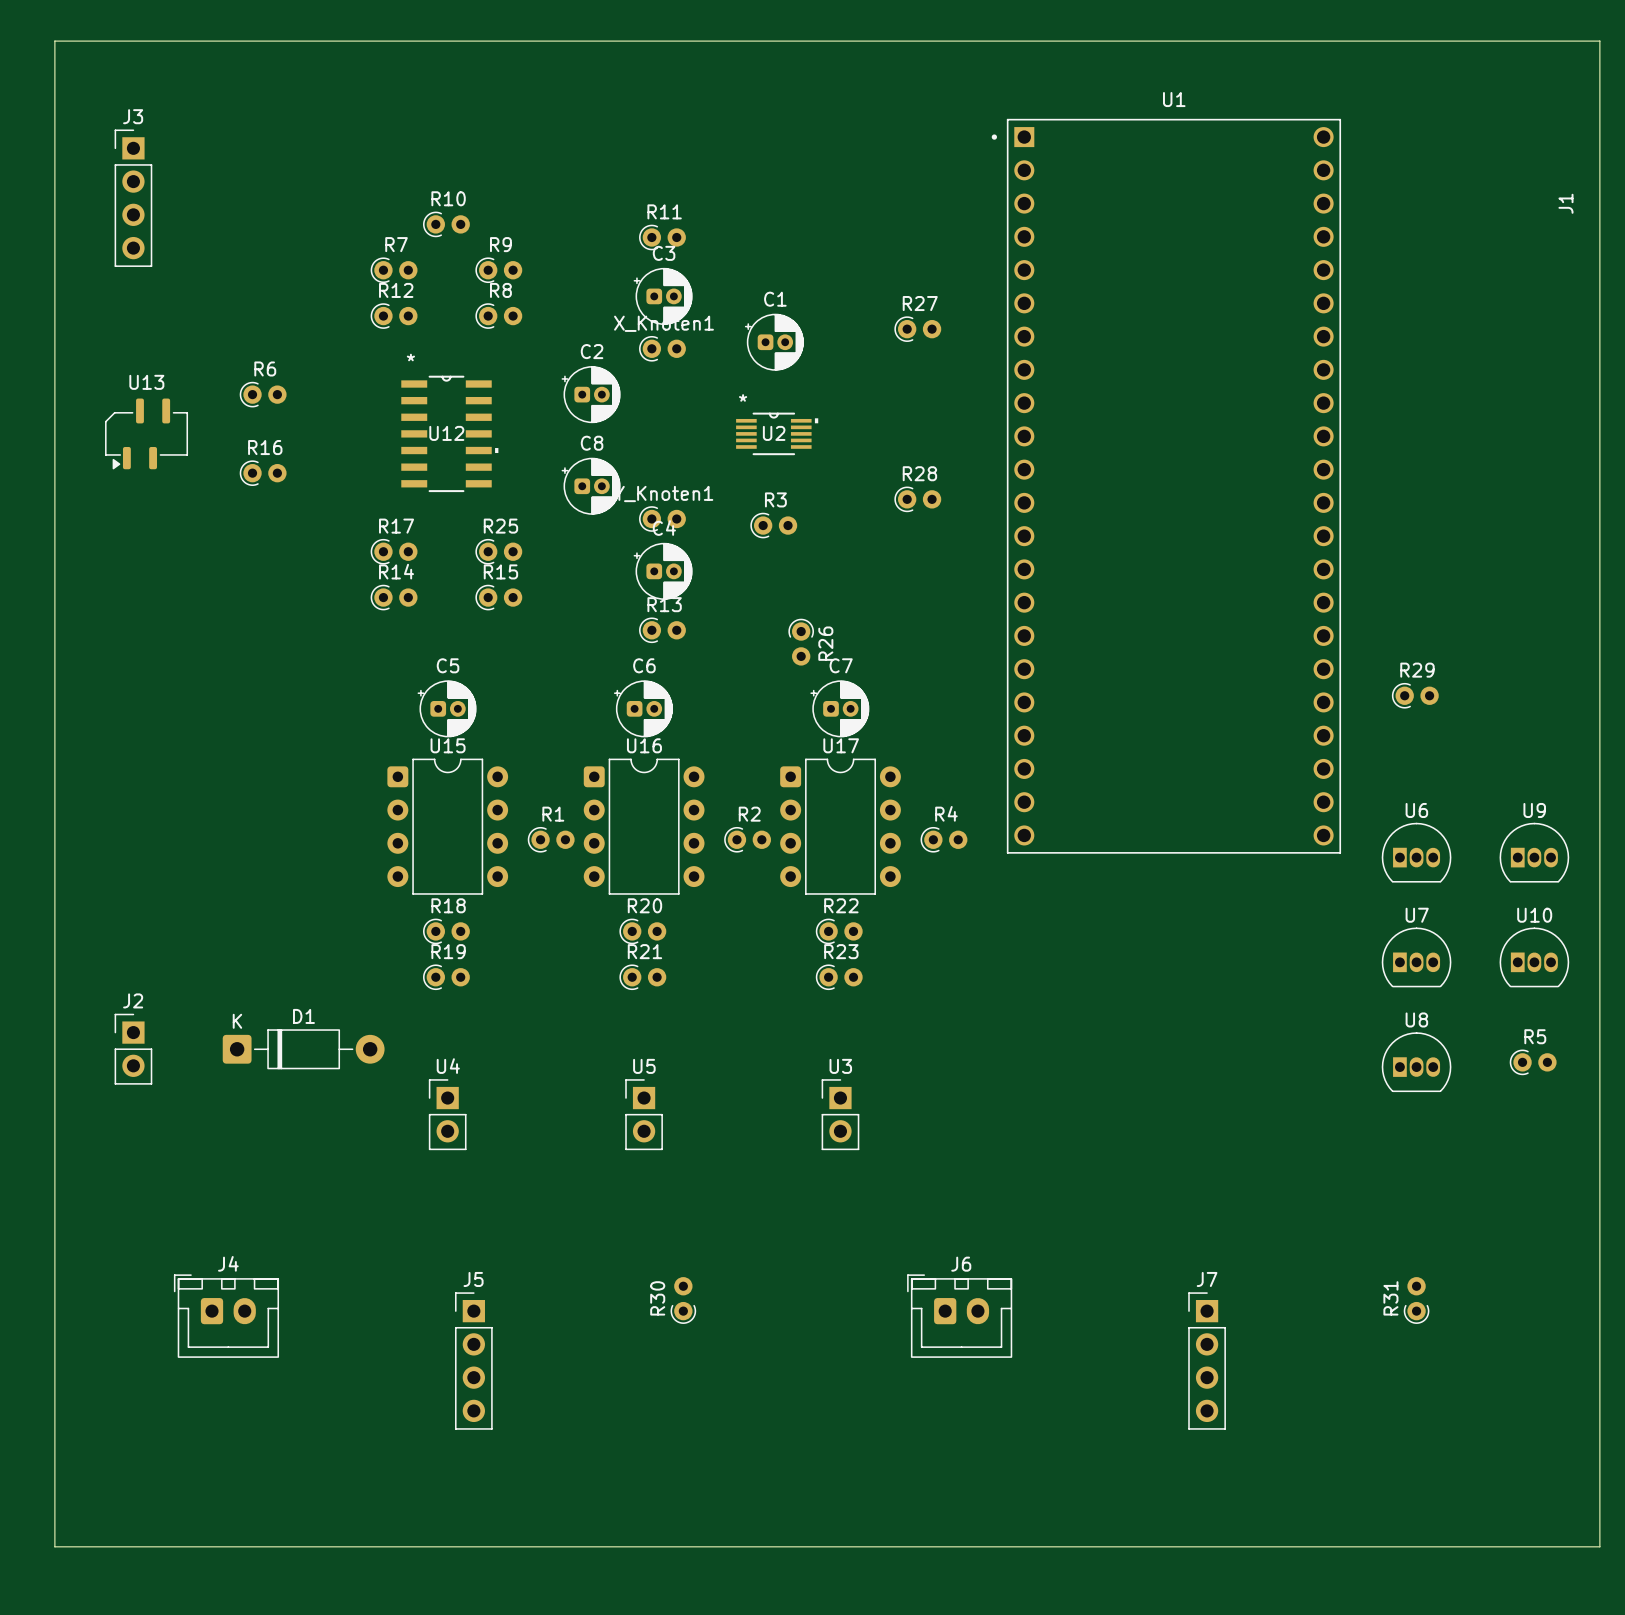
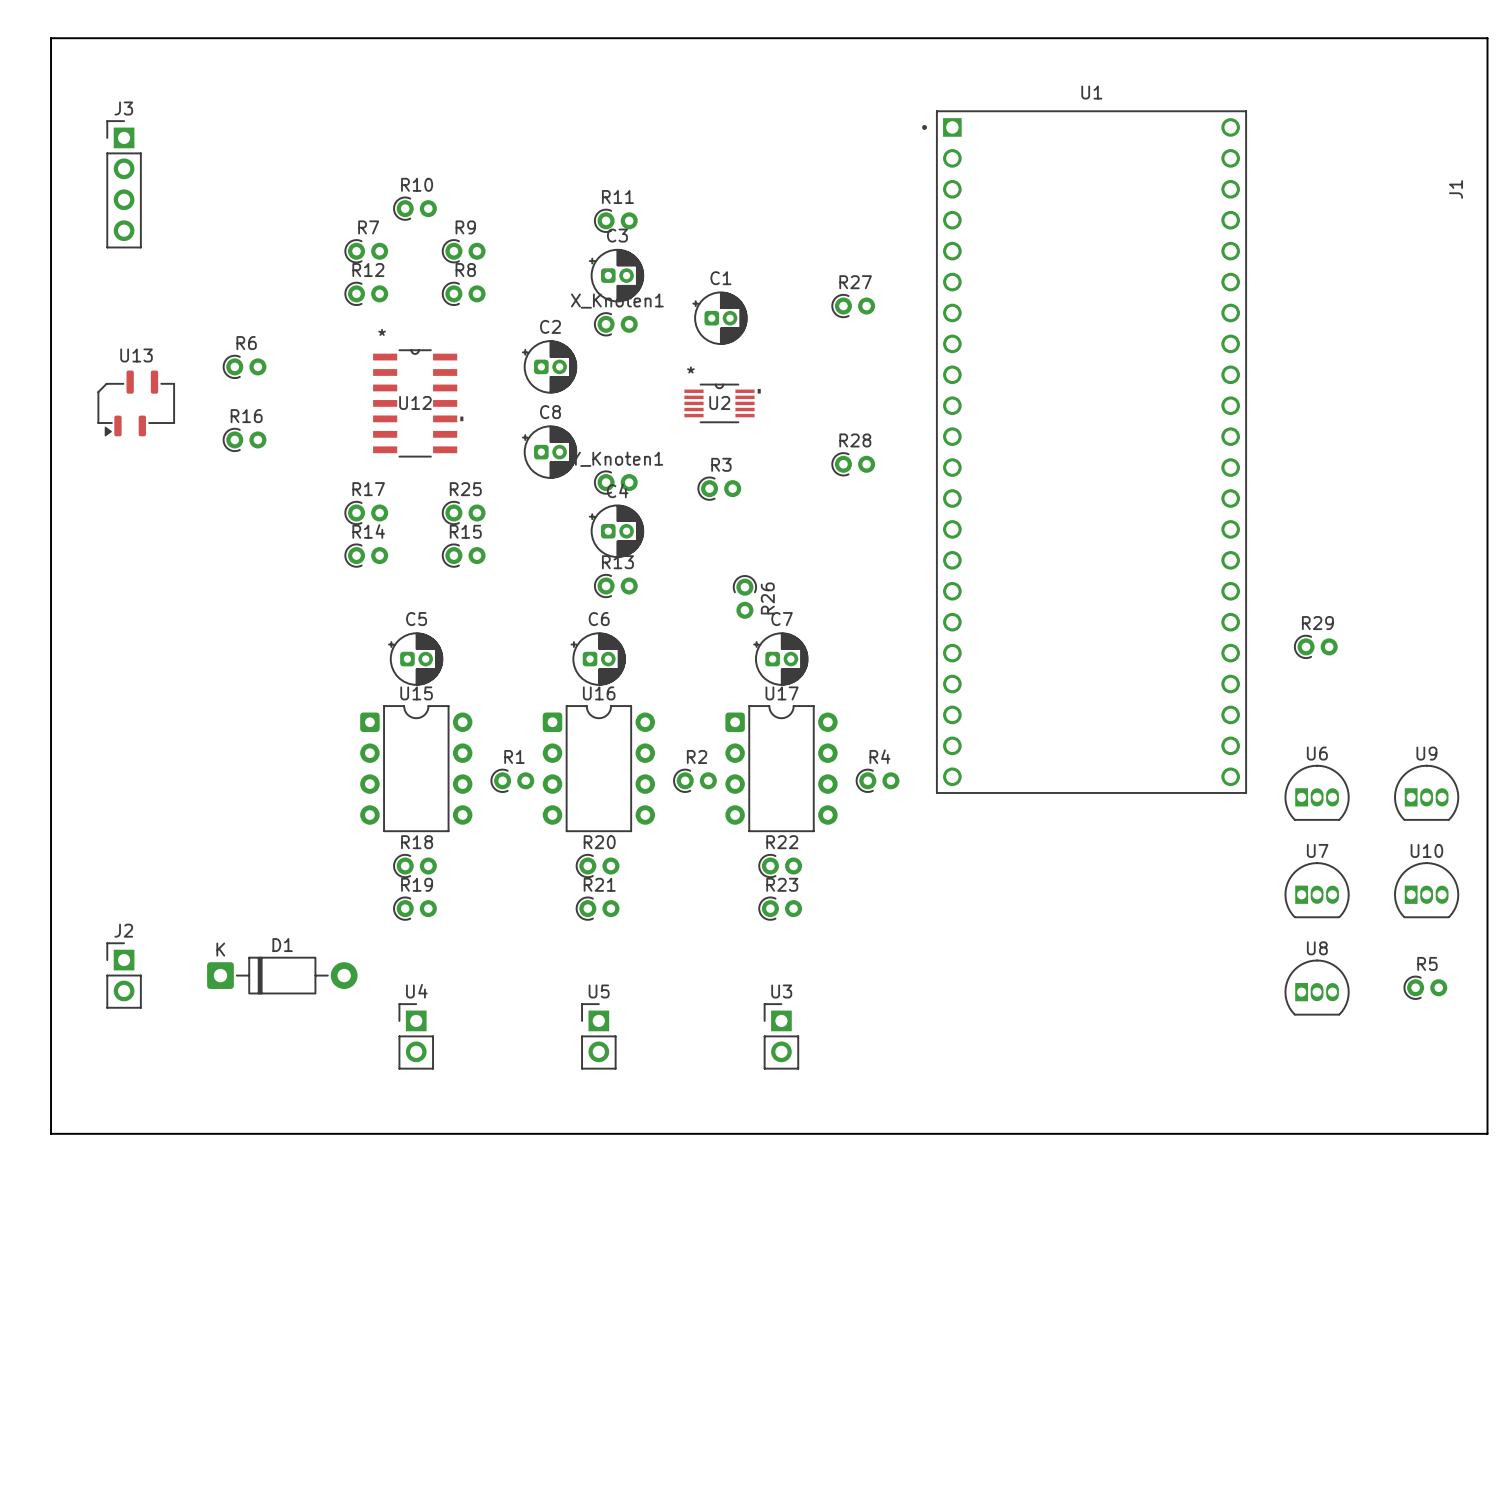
board edge: (54, 1219) (54, 1546) (1599, 1546) (1599, 1219) -> (51, 1133) (1487, 1133)
R30: (683, 1300) -> none
R31: (1416, 1300) -> none
J4: (226, 1316) -> none
J6: (959, 1316) -> none
J5: (473, 1361) -> none
J7: (1207, 1361) -> none

